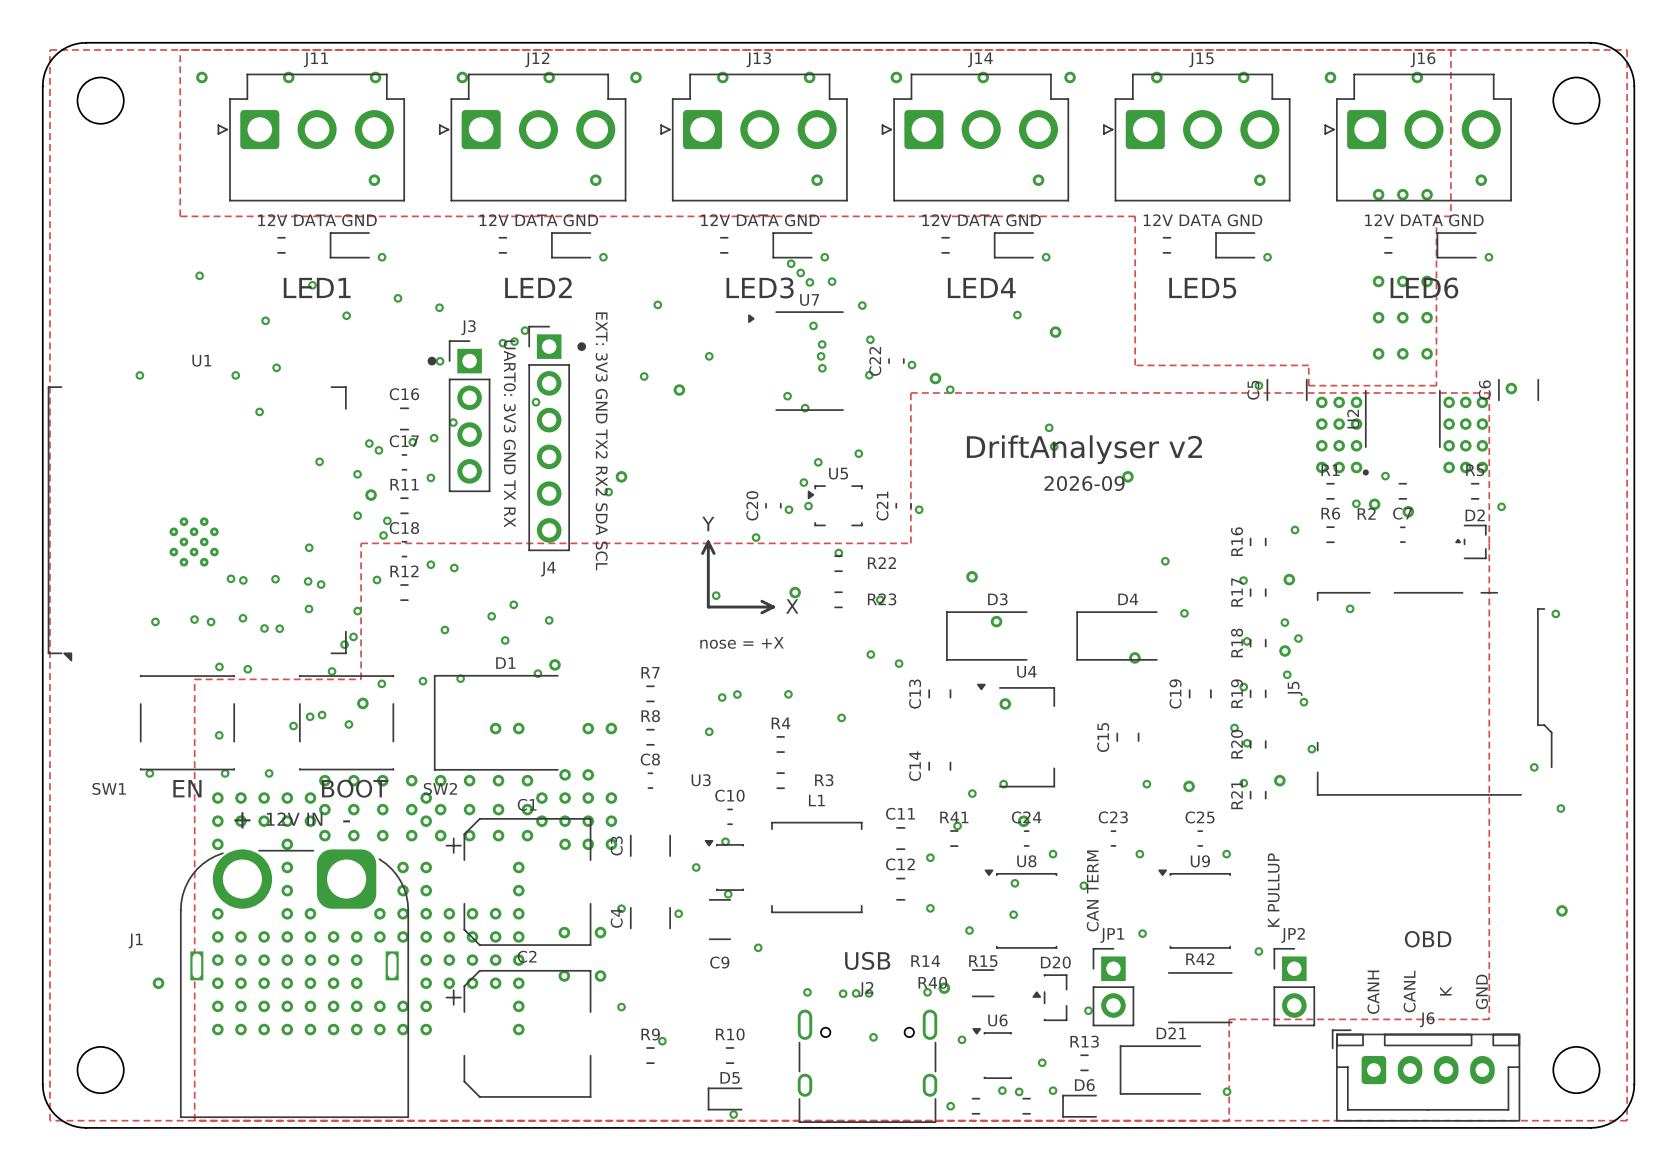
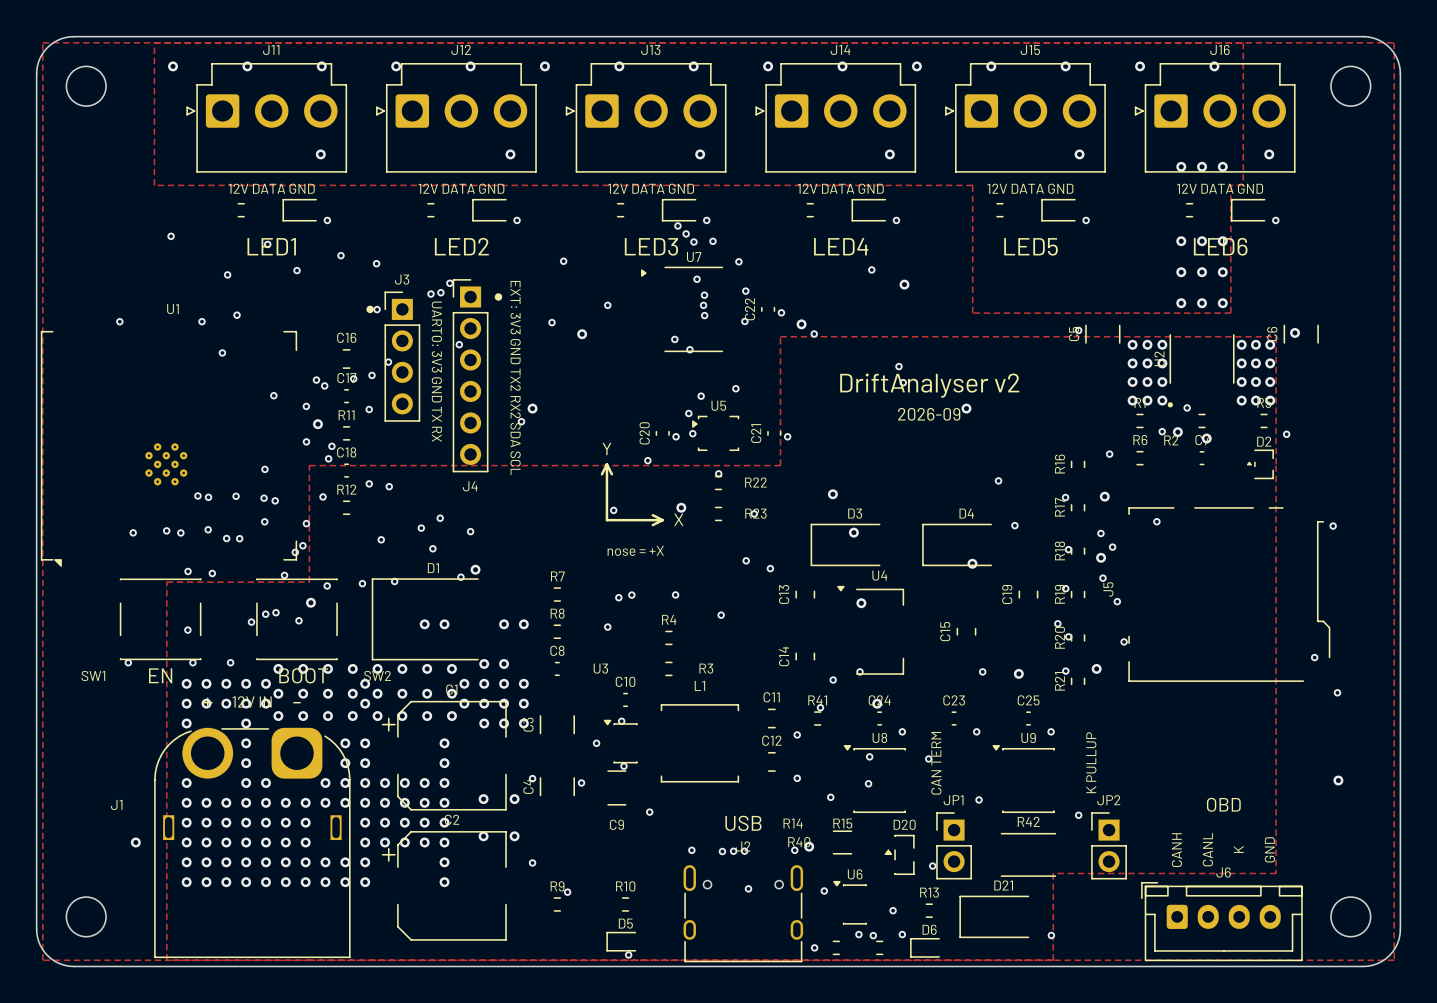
zone outline: (1308, 365) (1308, 385) (1436, 385) (1436, 365) -> (1121, 313) (1230, 313)

